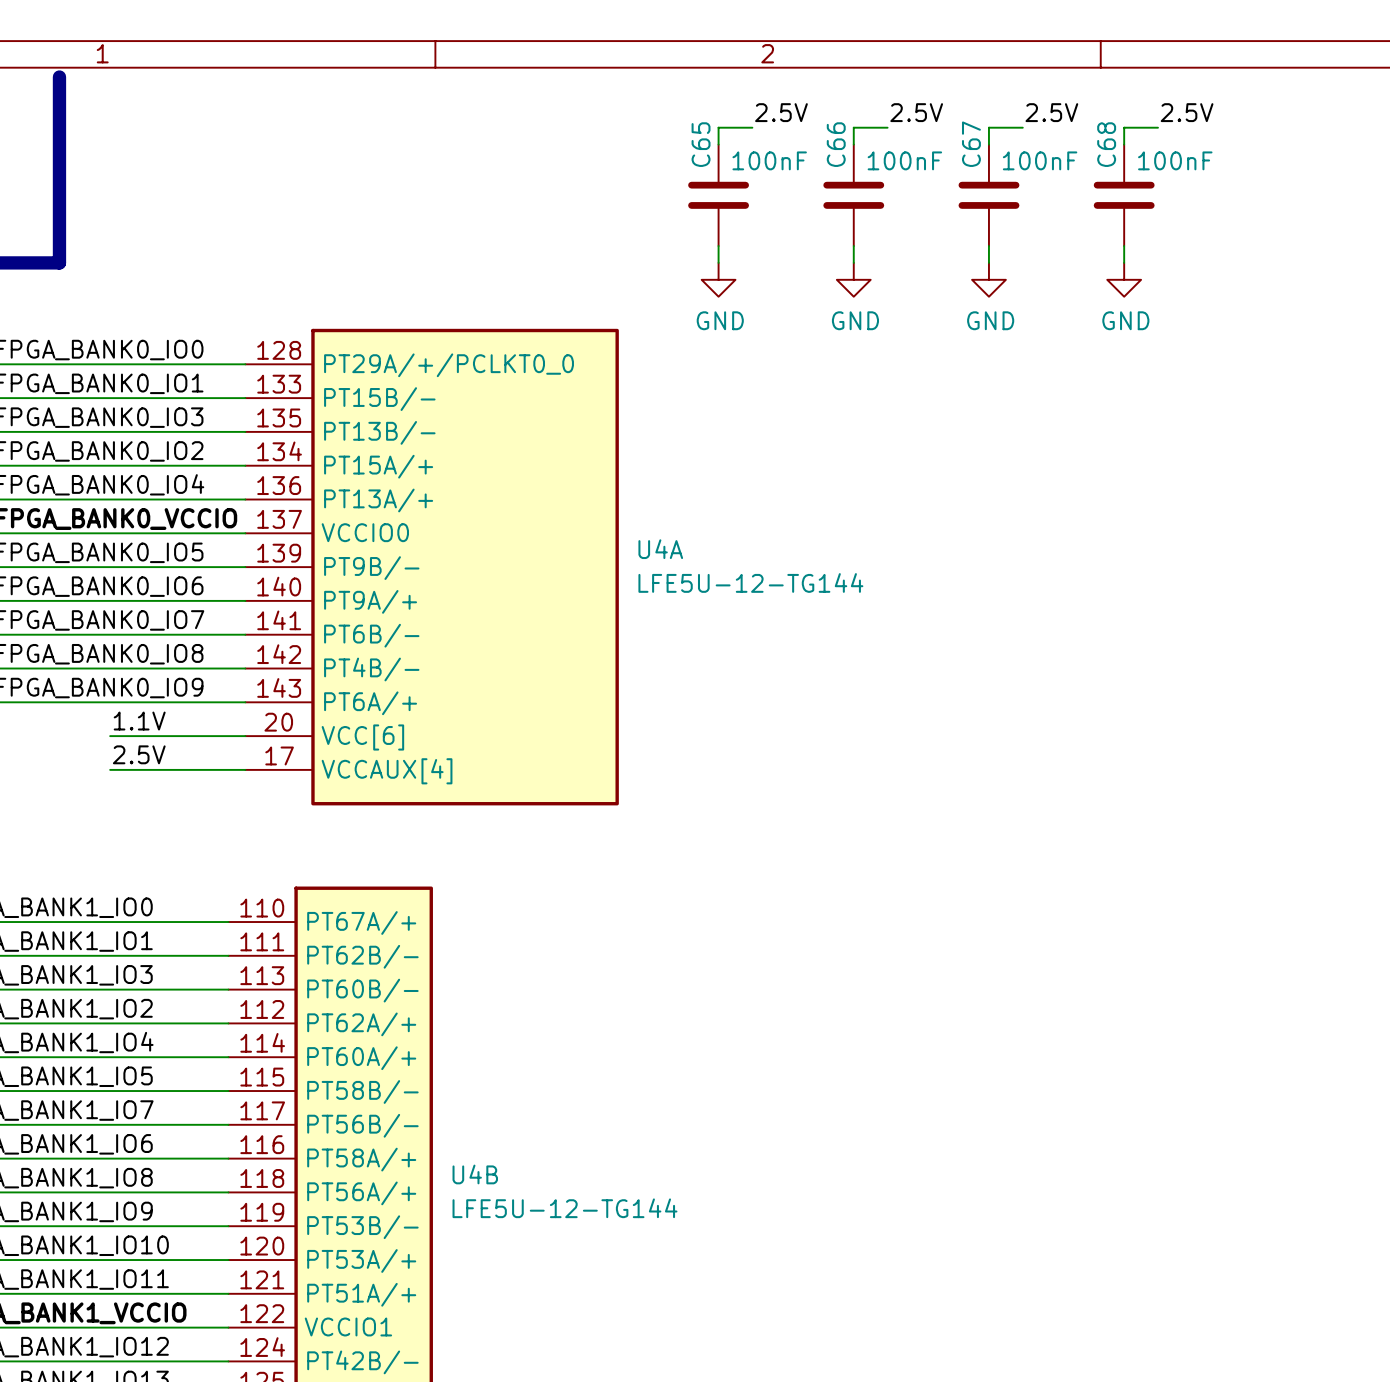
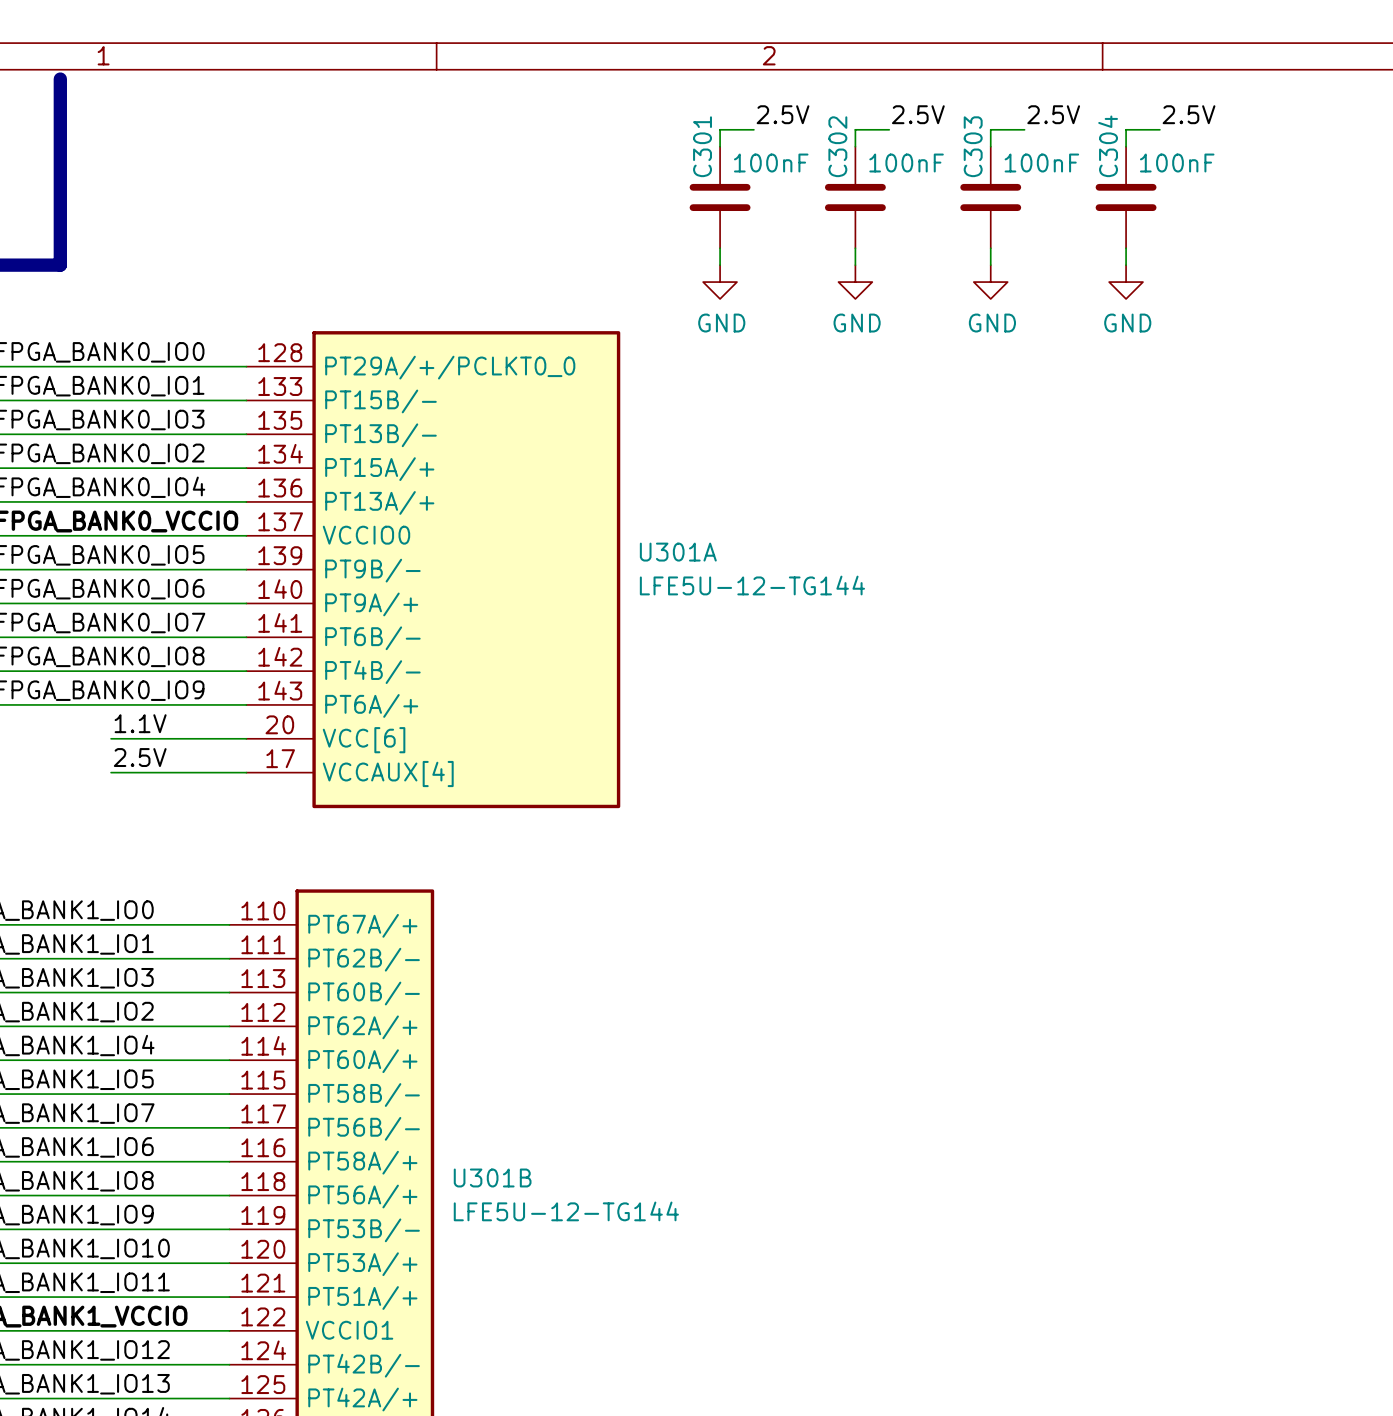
C65 name: C65 (701, 144) -> C301 (702, 146)
C66 name: C66 (836, 144) -> C302 (837, 146)
C67 name: C67 (971, 144) -> C303 (973, 146)
C68 name: C68 (1106, 144) -> C304 (1108, 146)
U4A name: U4A (660, 549) -> U301A (678, 552)
U4B name: U4B (475, 1174) -> U301B (492, 1177)

